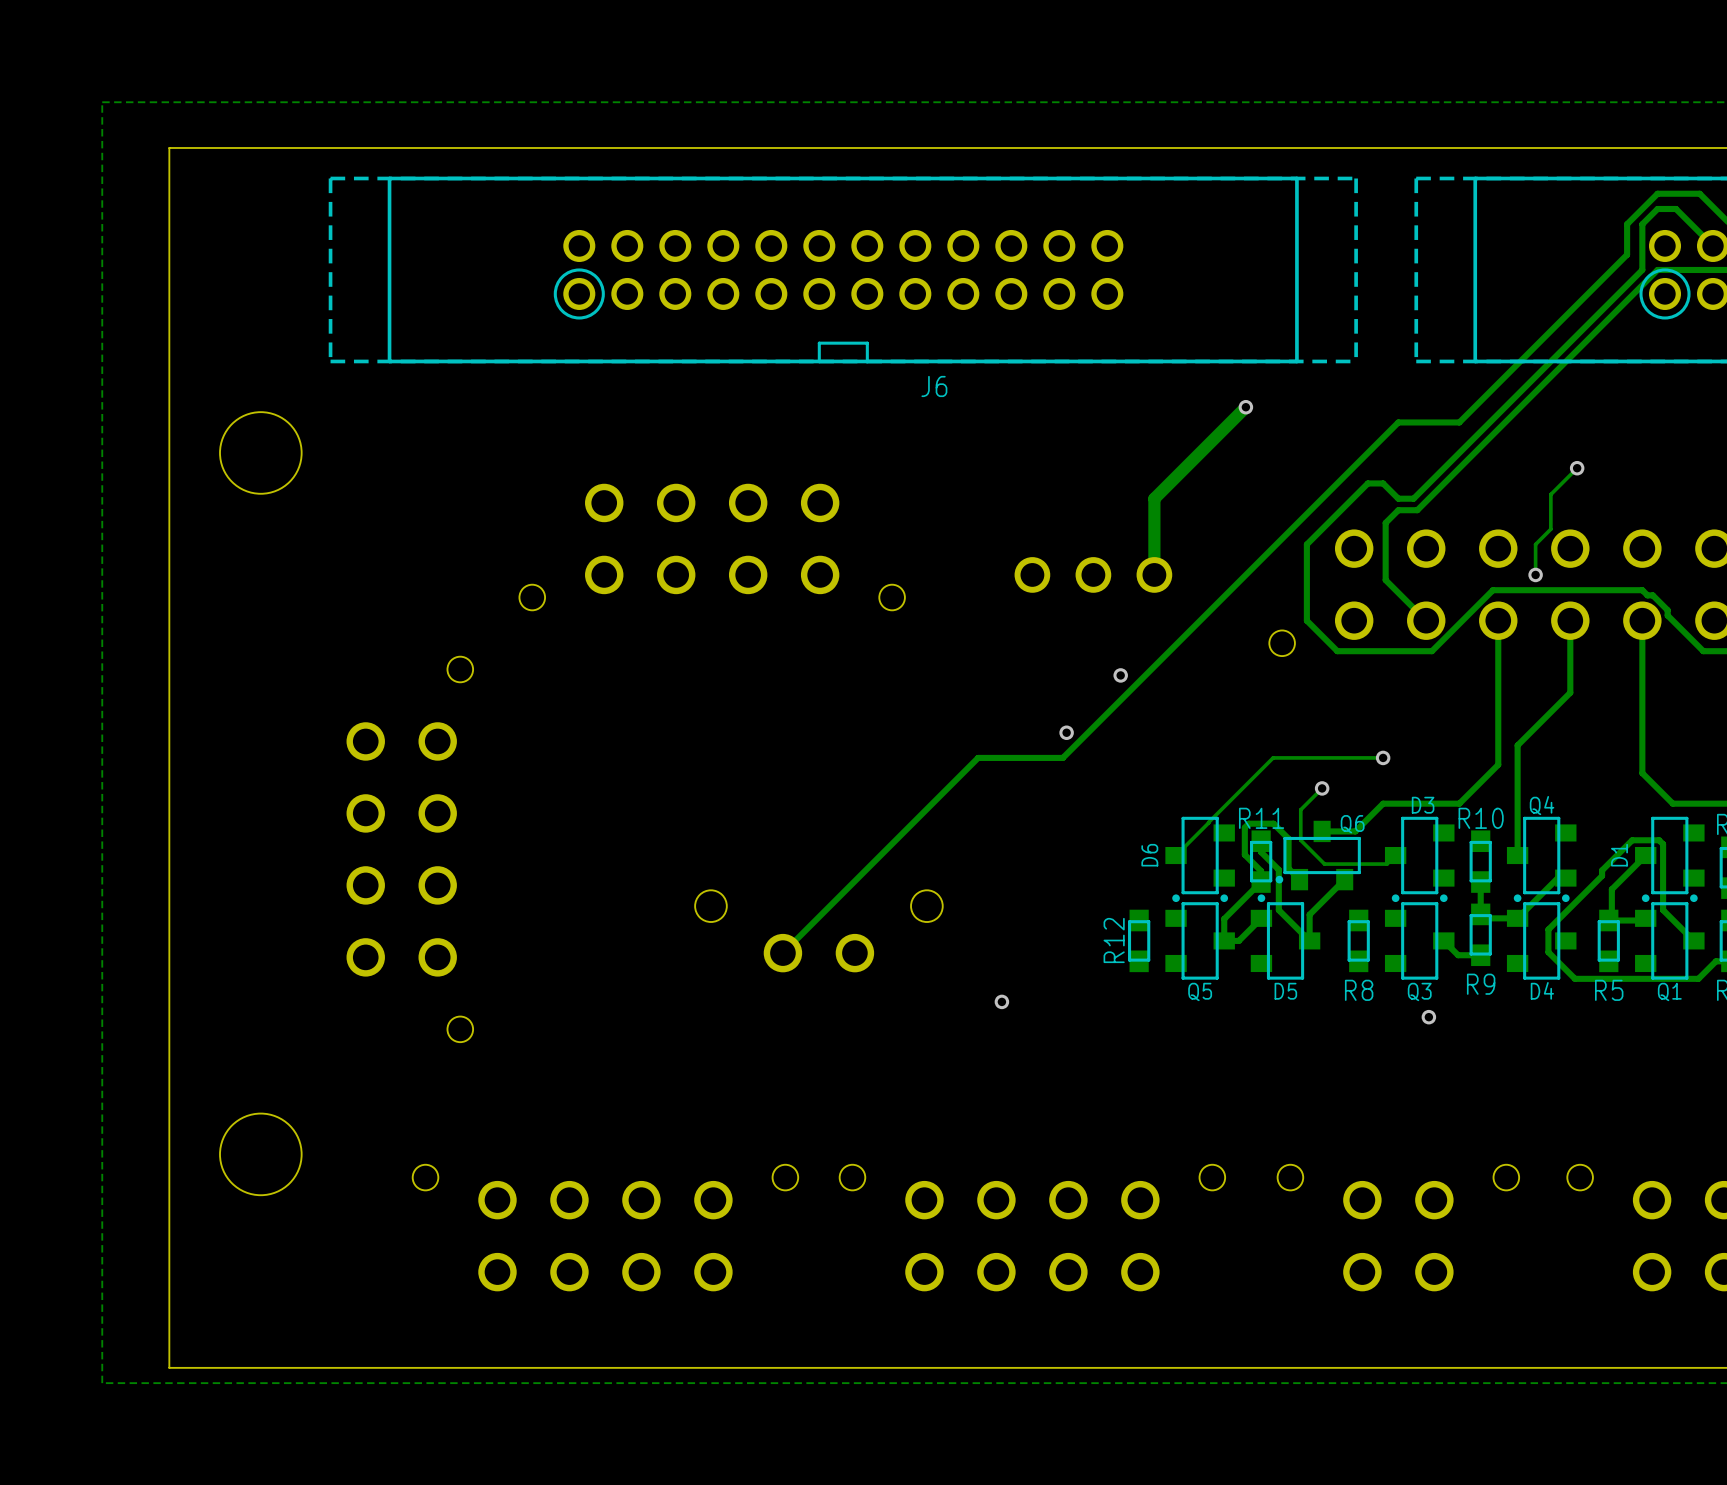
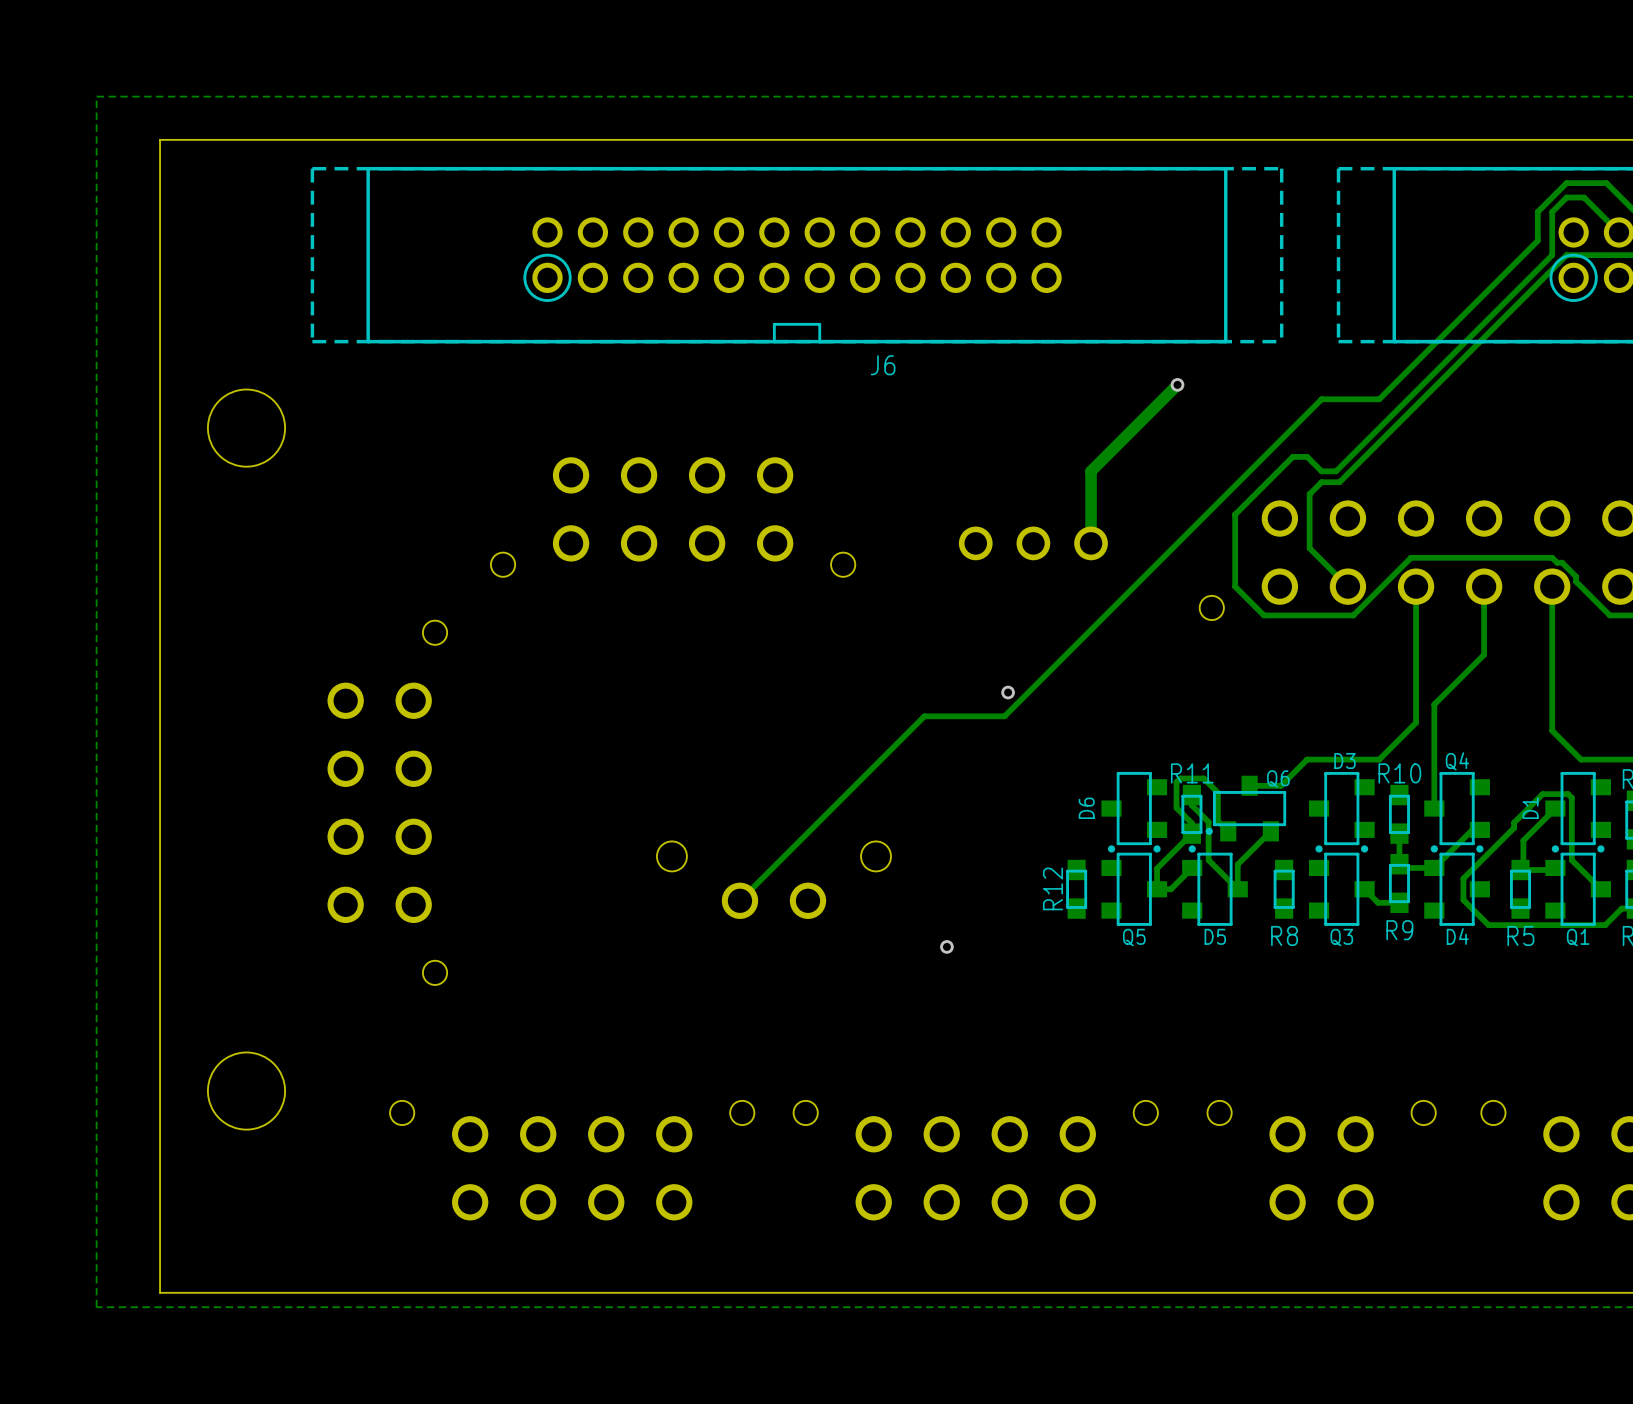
track: (1577, 468) (1550, 494) (1550, 529) (1535, 544) (1535, 574) -> none
via: (1577, 468) -> none
via: (1535, 574) -> none
via: (1120, 675) -> none
track: (1383, 757) (1273, 757) (1176, 855) -> none
via: (1383, 757) -> none
track: (1322, 788) (1300, 809) (1300, 840) (1324, 864) (1387, 864) (1395, 855) -> none
via: (1322, 788) -> none
via: (1428, 1017) -> none

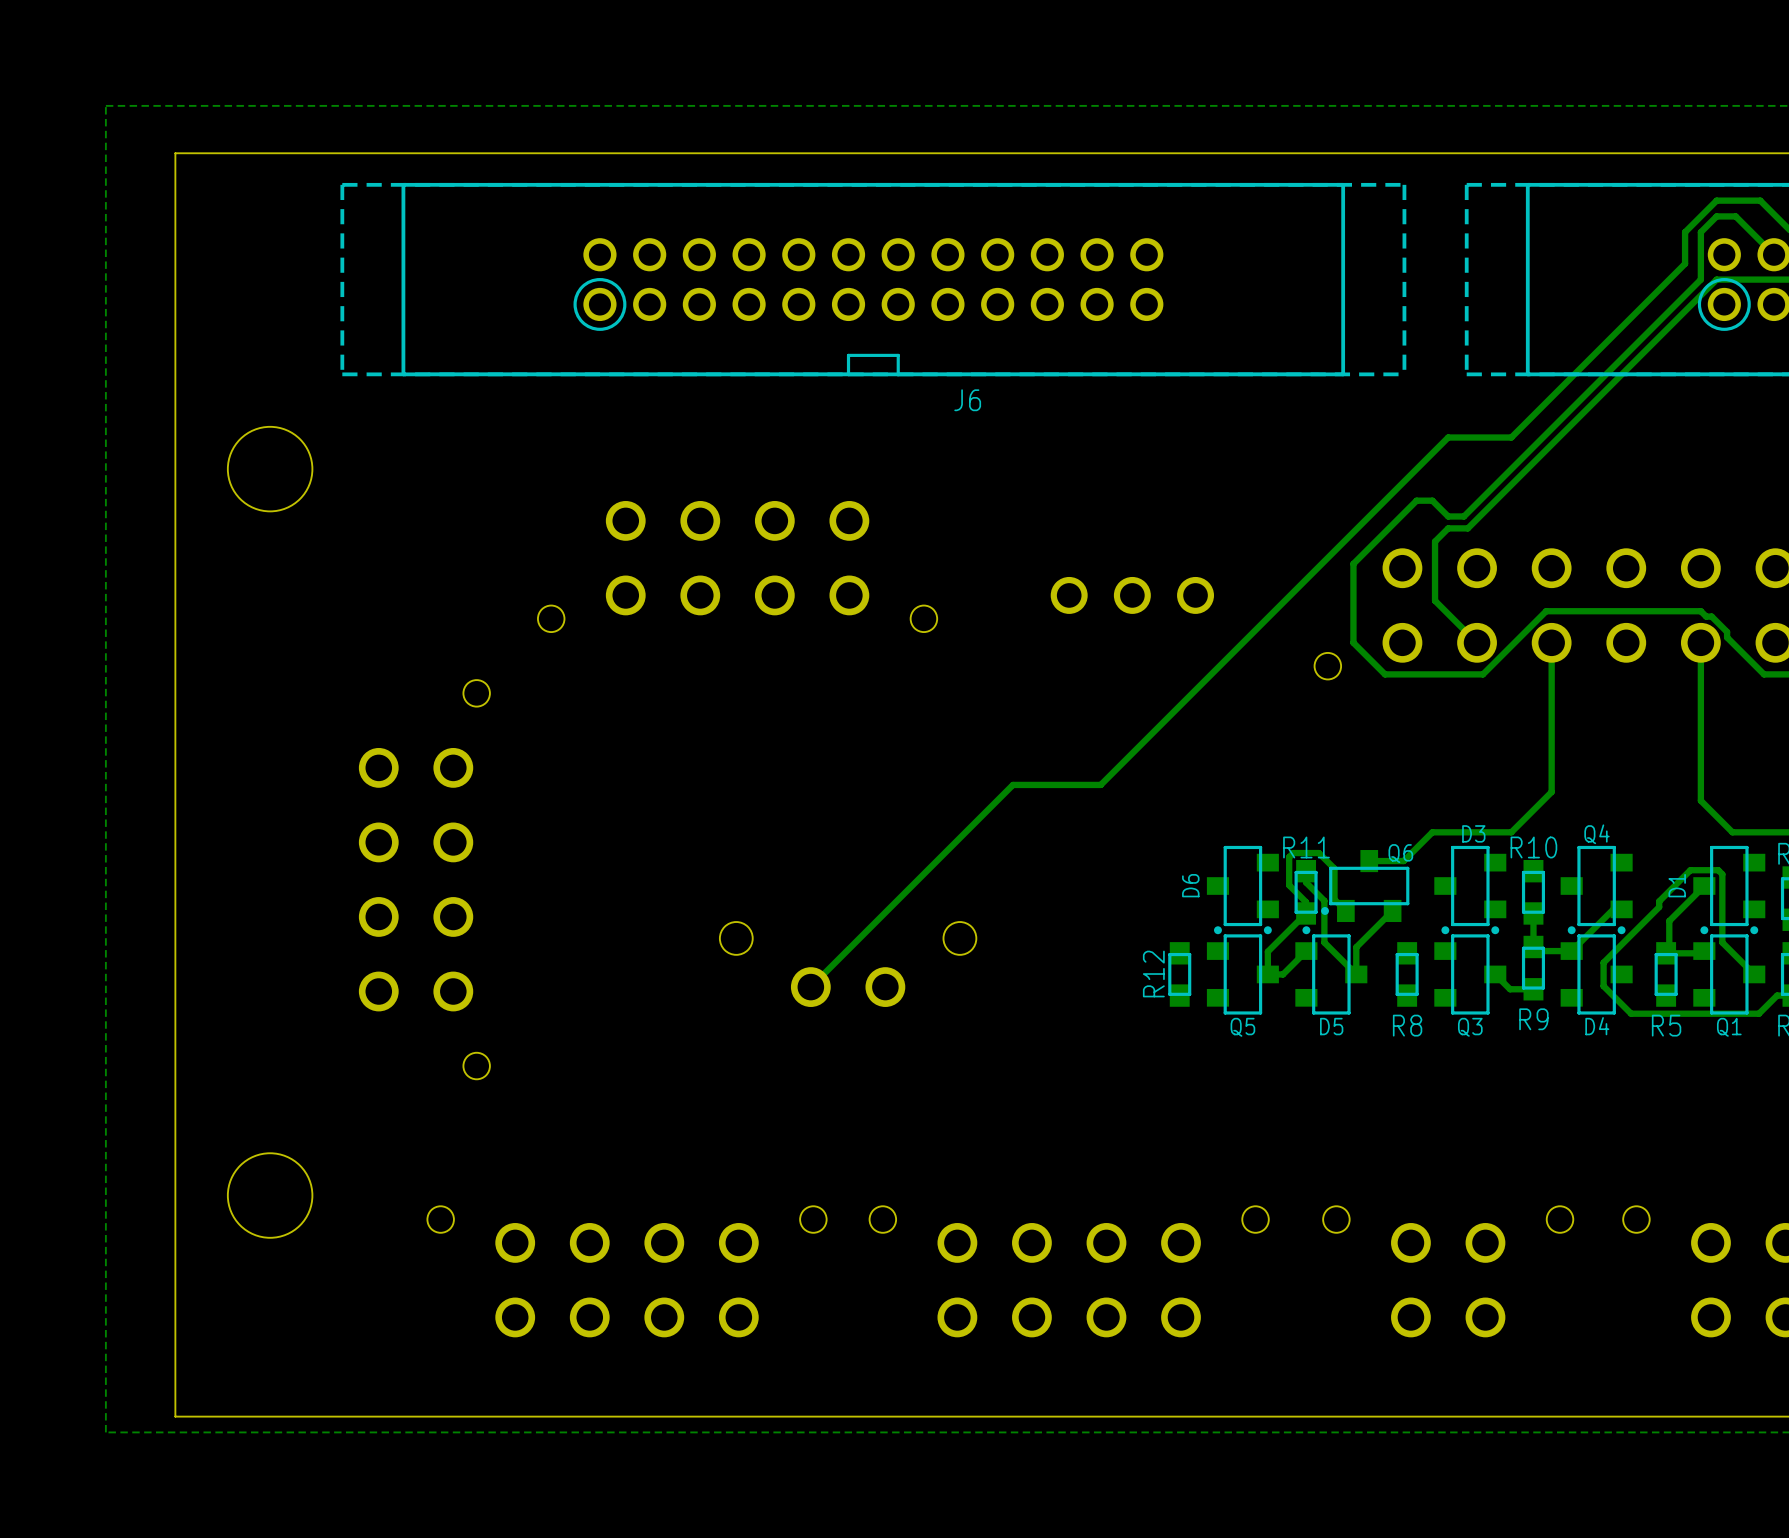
track: (1177, 384) (1091, 471) (1091, 543) -> none
via: (1177, 384) -> none
track: (1484, 586) (1484, 654) (1434, 704) (1434, 808) -> none
via: (1008, 692) -> none
via: (946, 946) -> none

